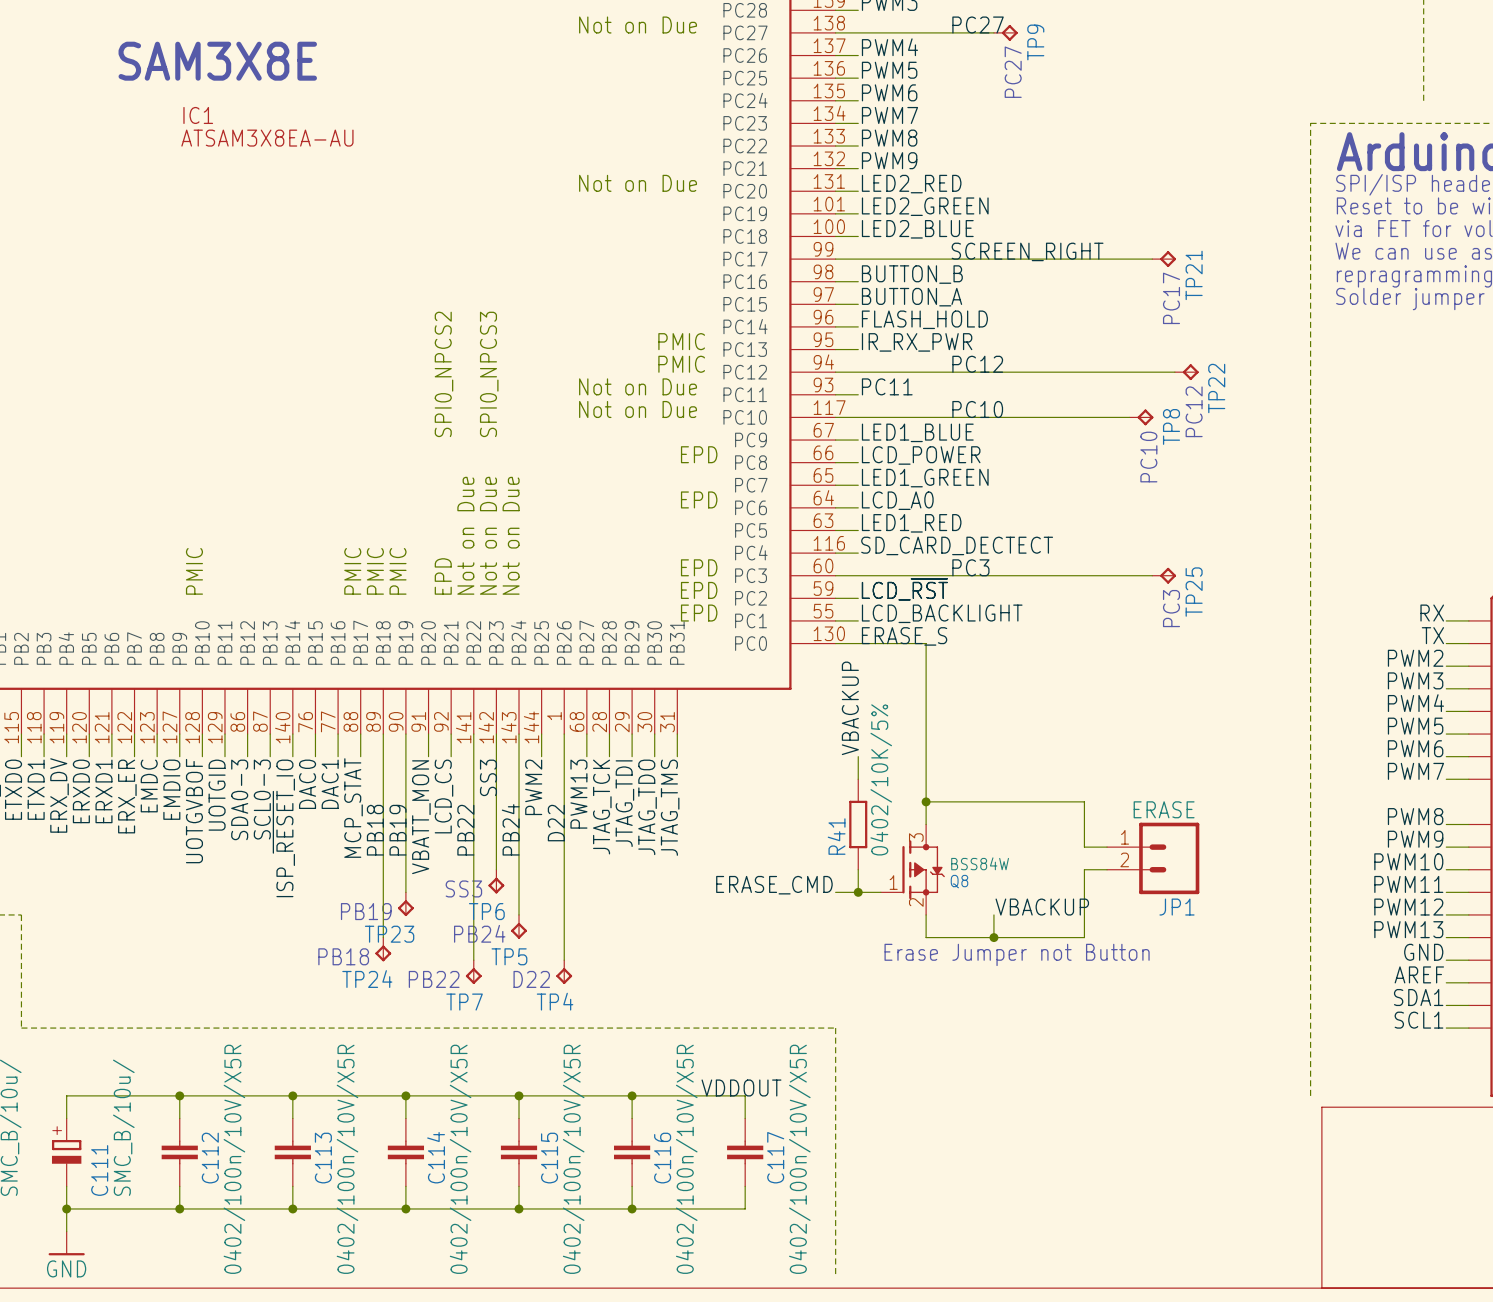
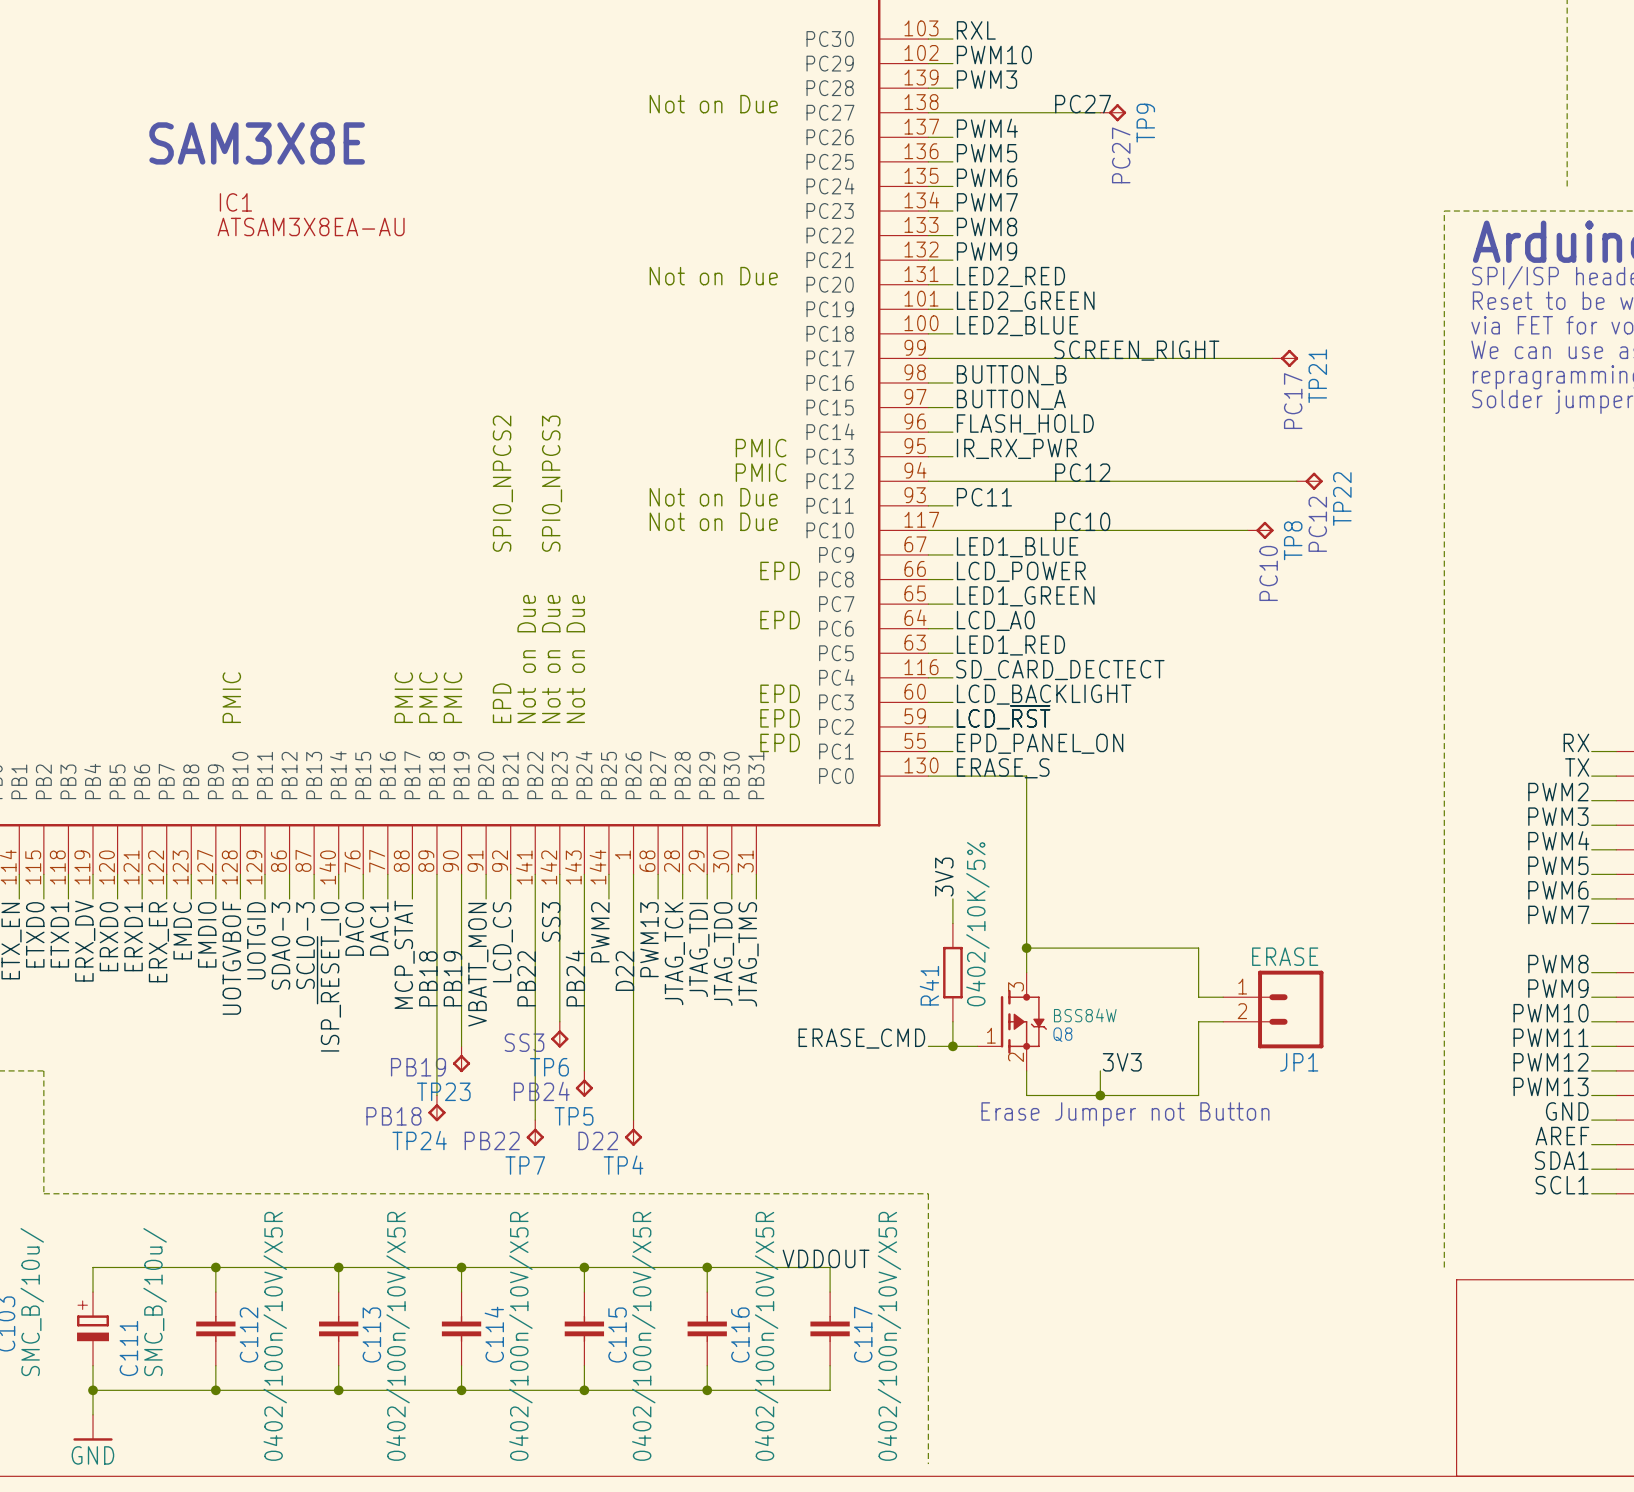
label: PC3 (970, 567) -> none
label: none -> LCD_BACKLIGHT (1044, 694)
wire: (858, 575) (1152, 575) -> none
TP25: PC3 (1164, 575) -> none
label: LCD_BACKLIGHT (942, 613) -> EPD_PANEL_ON (1040, 743)
label: VBACKUP (850, 708) -> 3V3 (944, 877)
label: VBACKUP (1042, 907) -> 3V3 (1122, 1062)

